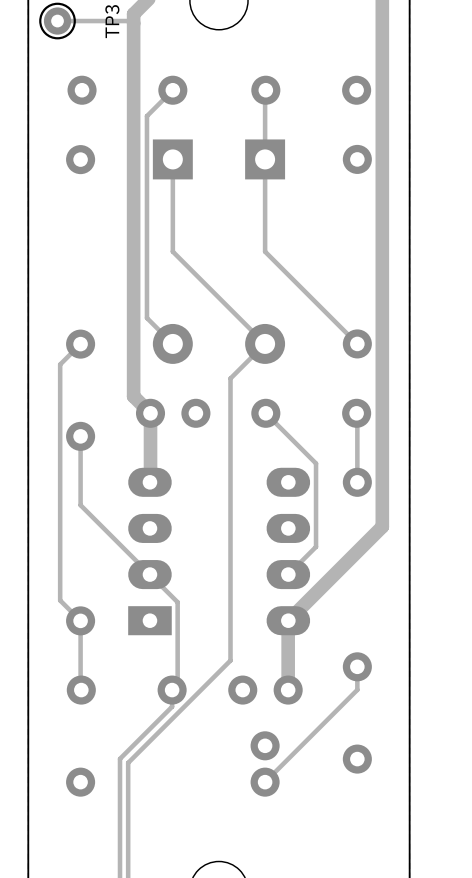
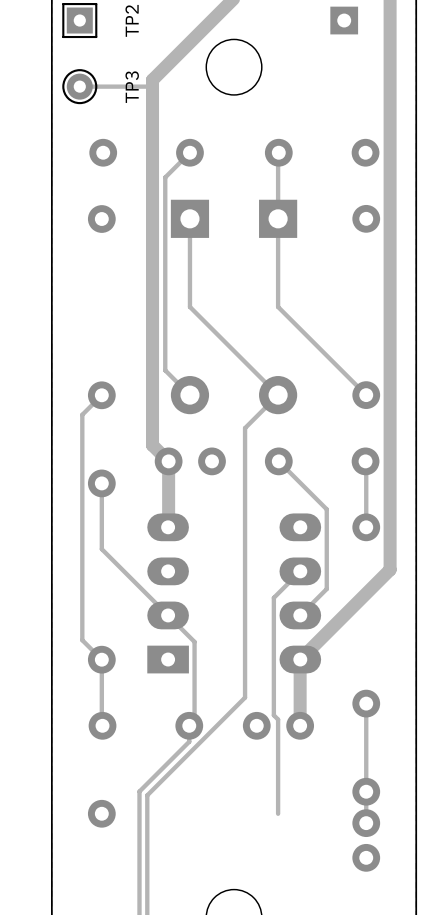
track: none -> (300, 571) (273, 597) (273, 715) (278, 719) (278, 813)
track: (357, 689) (265, 782) -> (366, 725) (366, 823)
part position: (265, 763) -> (366, 840)

